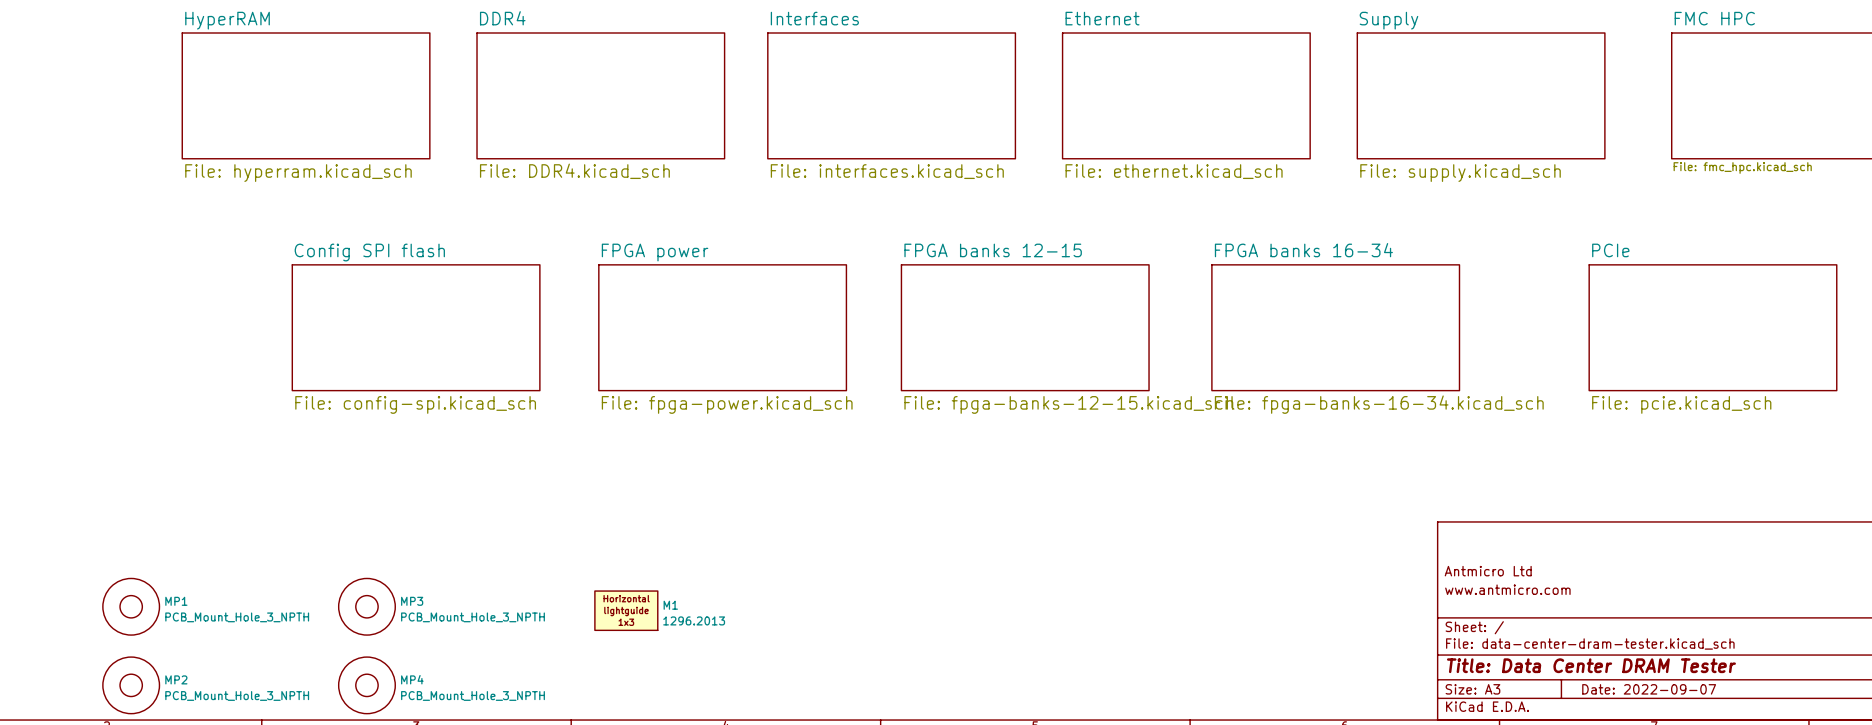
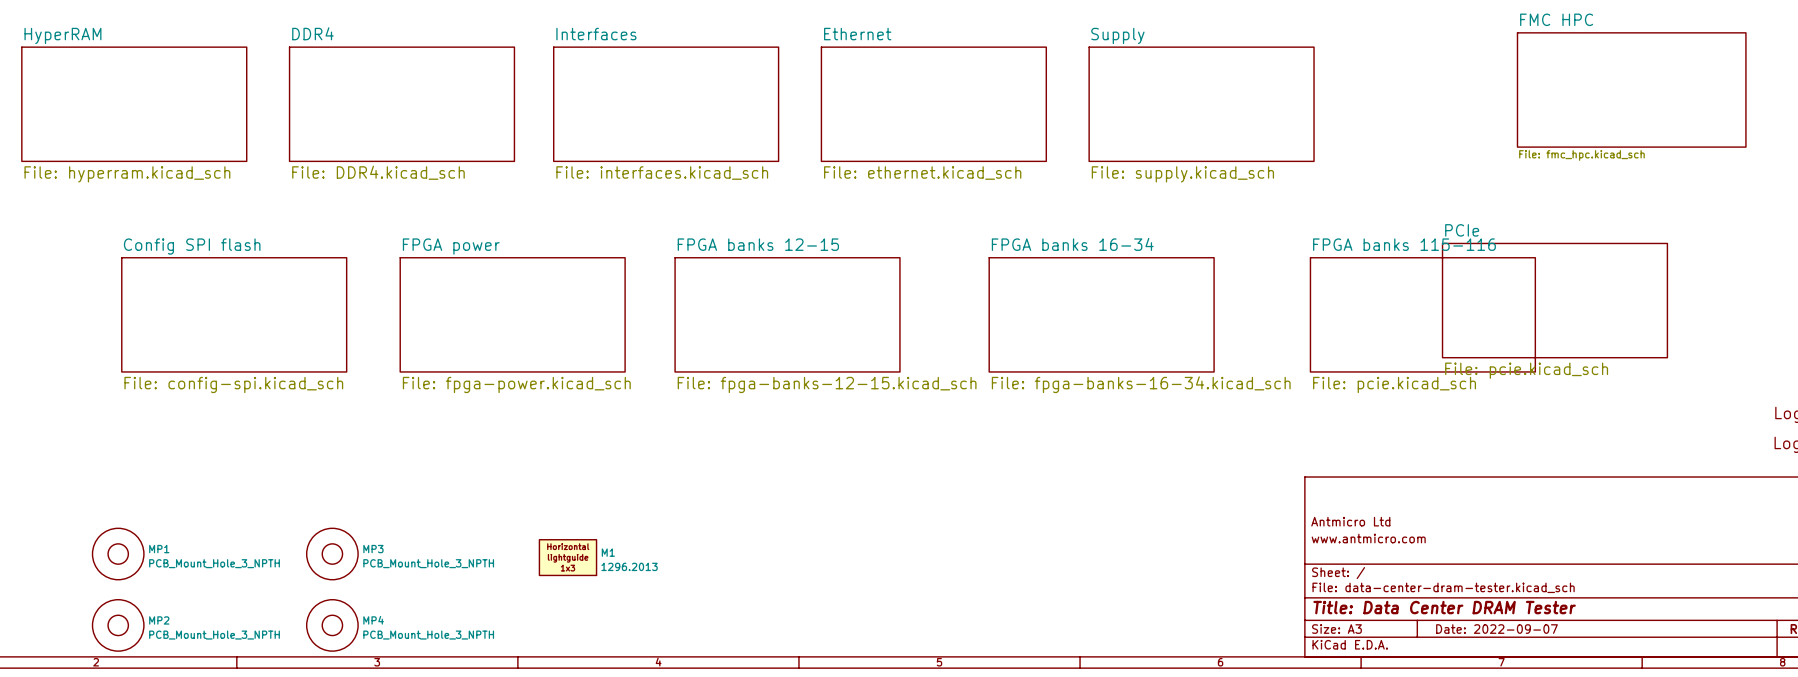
sheet HyperRAM: File: hyperram.kicad_sch (306, 95) -> none
sheet DDR4 position: (600, 95) -> (401, 104)
sheet Interfaces: File: interfaces.kicad_sch (891, 95) -> none
sheet Ethernet: File: ethernet.kicad_sch (1186, 95) -> none
sheet Supply: File: supply.kicad_sch (1481, 95) -> none
sheet HyperRAM: none -> File: hyperram.kicad_sch (134, 104)
sheet Interfaces: none -> File: interfaces.kicad_sch (666, 104)
sheet Ethernet: none -> File: ethernet.kicad_sch (933, 104)
sheet Supply: none -> File: supply.kicad_sch (1201, 104)
sheet Config SPI flash: File: config-spi.kicad_sch (416, 327) -> none
sheet FPGA power: File: fpga-power.kicad_sch (722, 327) -> none
sheet FPGA banks 12-15 position: (1025, 327) -> (787, 314)
sheet FPGA banks 16-34 position: (1335, 327) -> (1101, 314)
sheet Config SPI flash: none -> File: config-spi.kicad_sch (234, 314)
sheet FPGA power: none -> File: fpga-power.kicad_sch (512, 314)
sheet FPGA banks 115-116: none -> File: pcie.kicad_sch (1422, 314)

